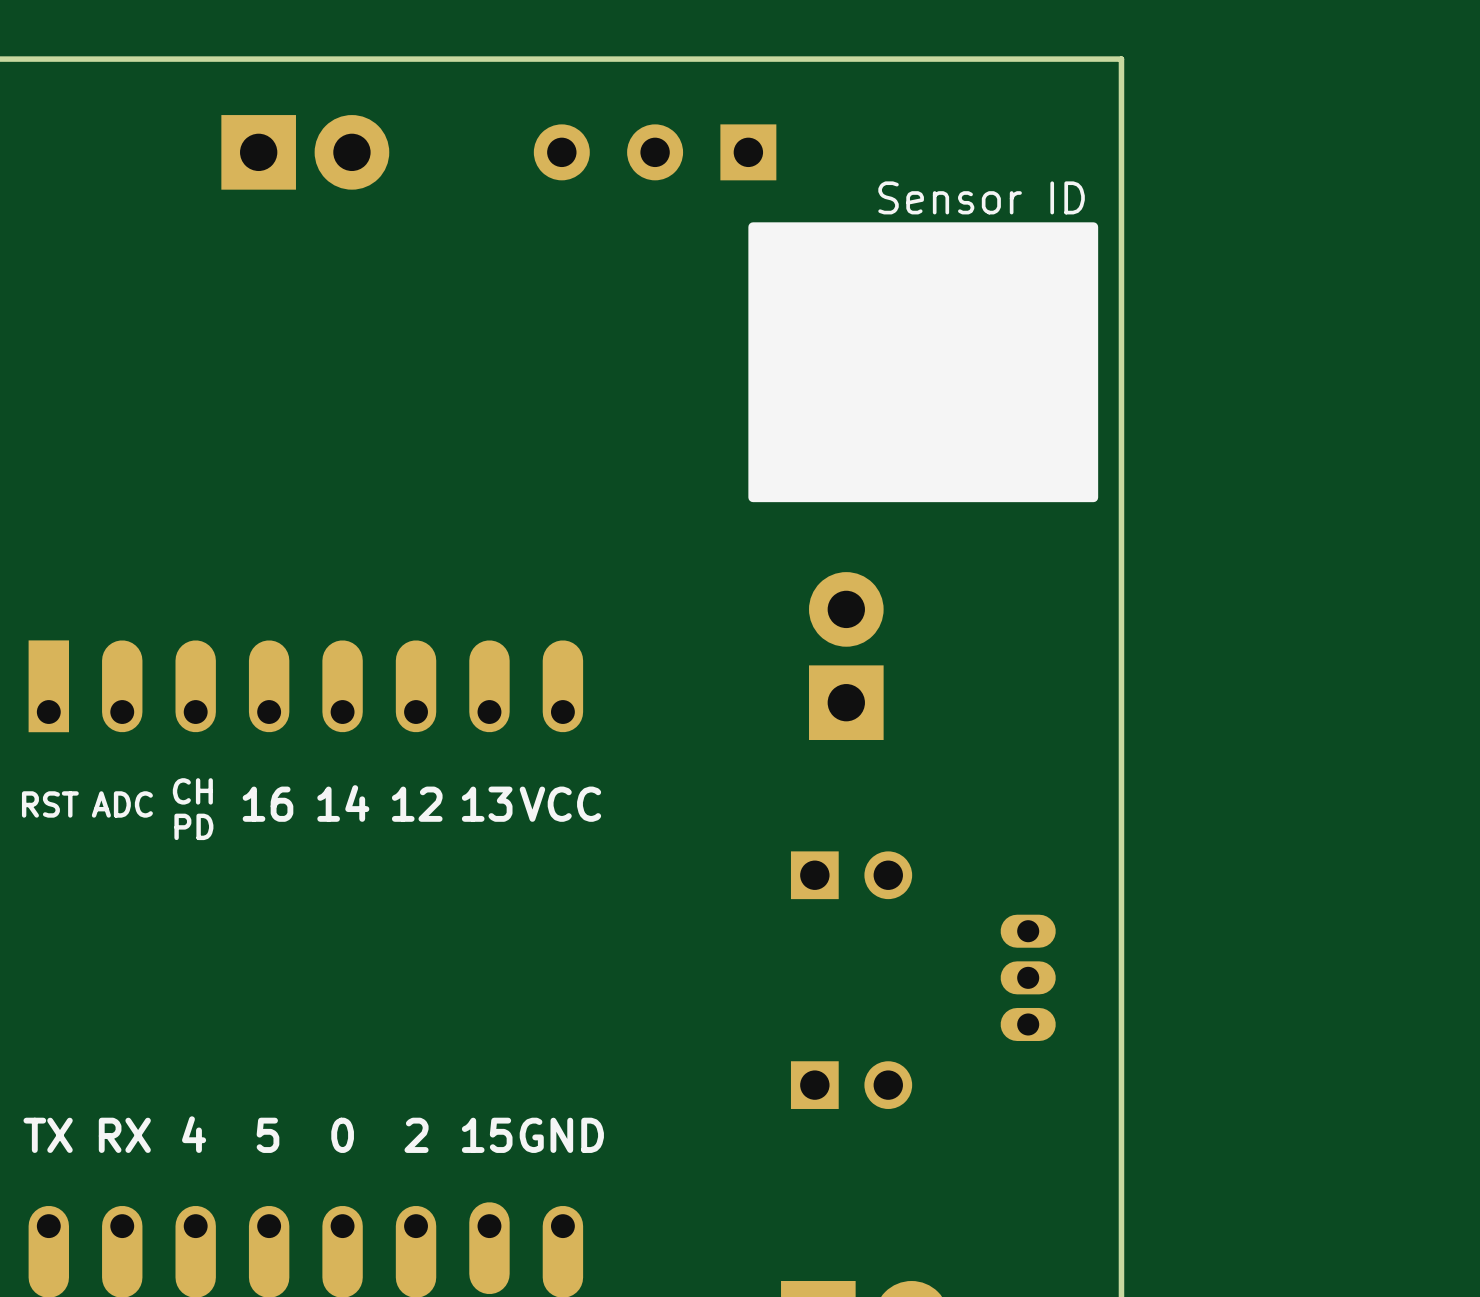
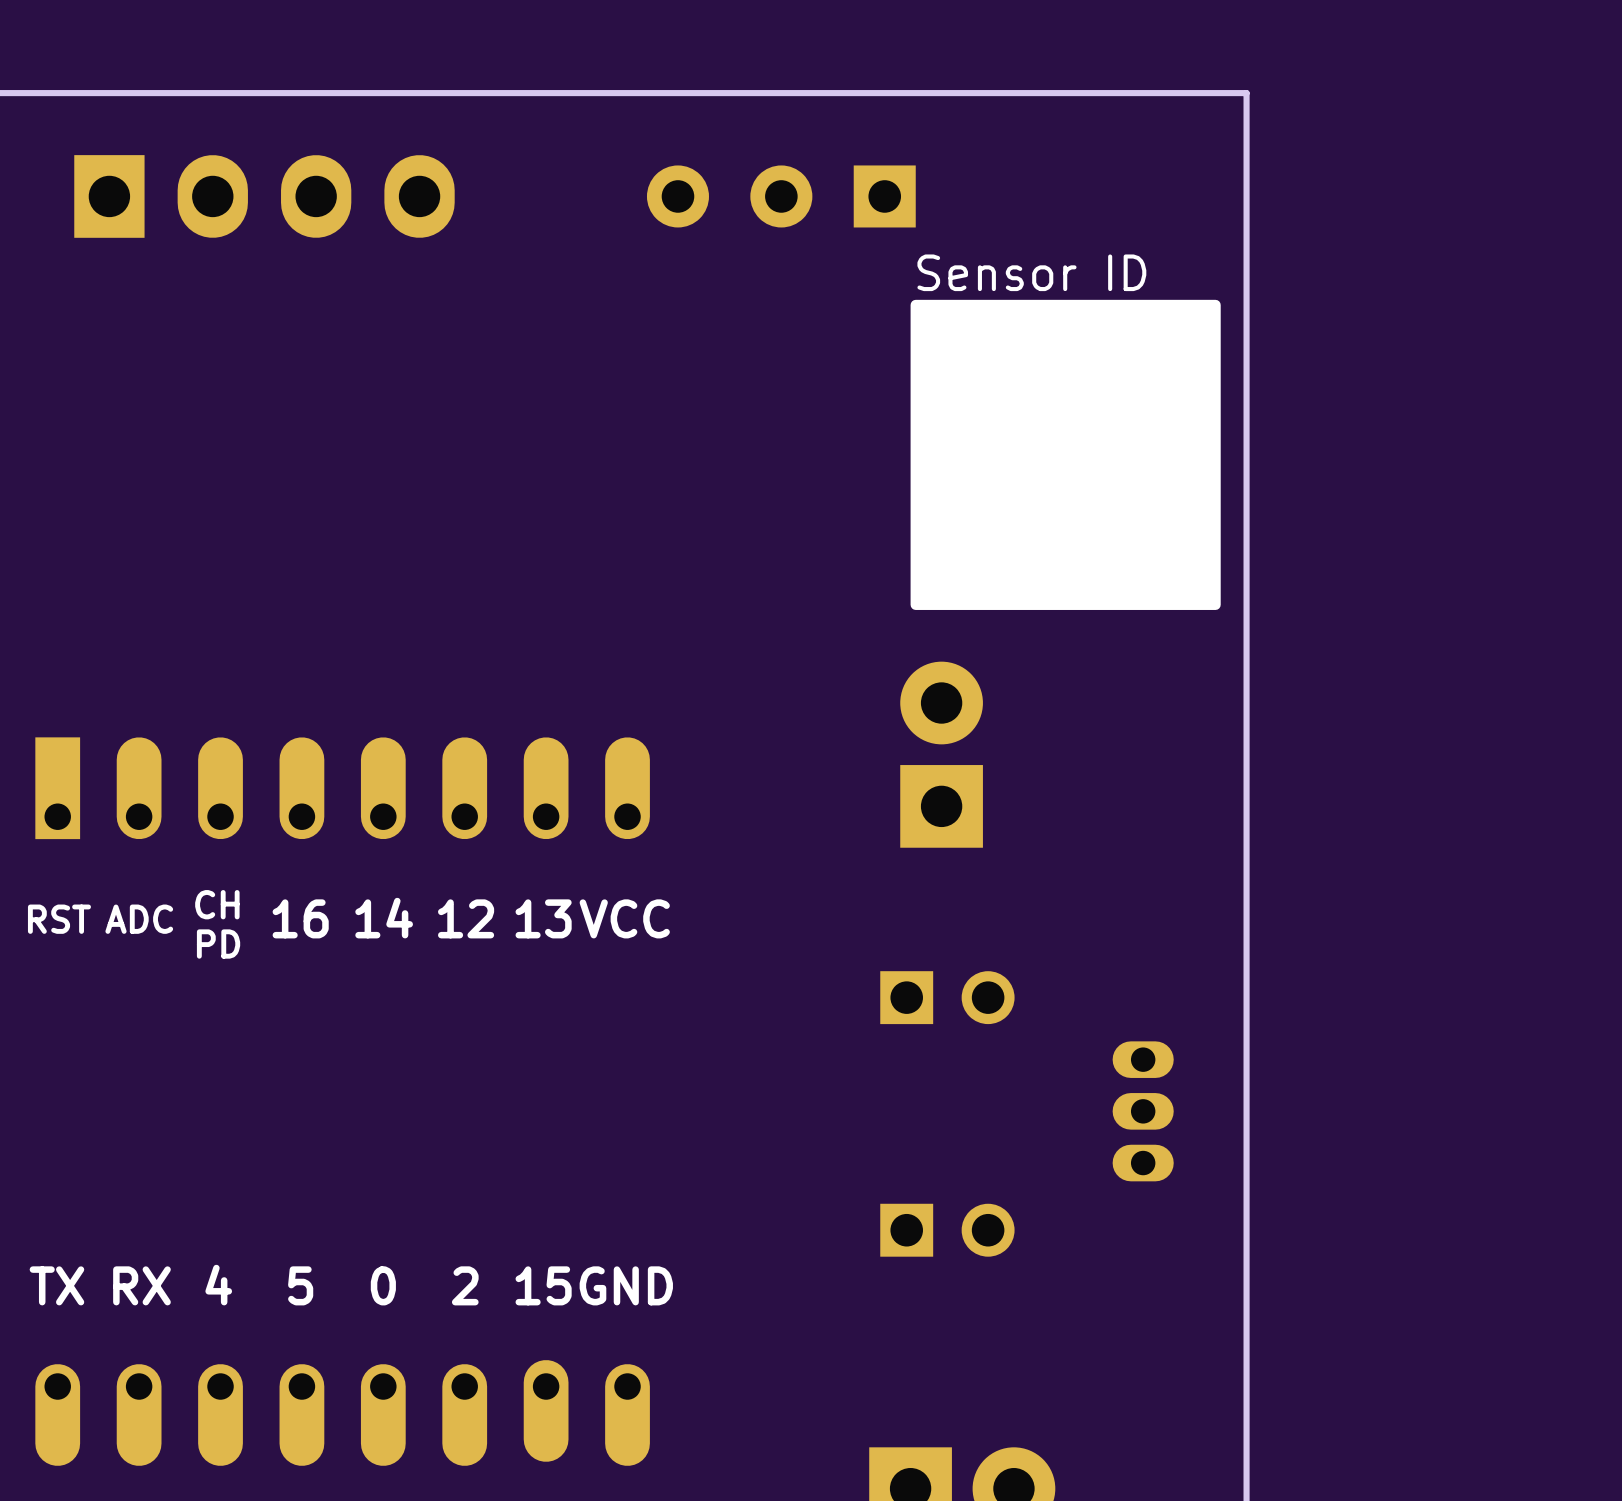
part: none -> (264, 196)
part: (305, 152) -> none
part position: (655, 152) -> (781, 196)
text position: Sensor ID (981, 197) -> Sensor ID (1031, 272)
drawing: [748, 222, 1099, 503] -> none
drawing: none -> [910, 299, 1221, 610]

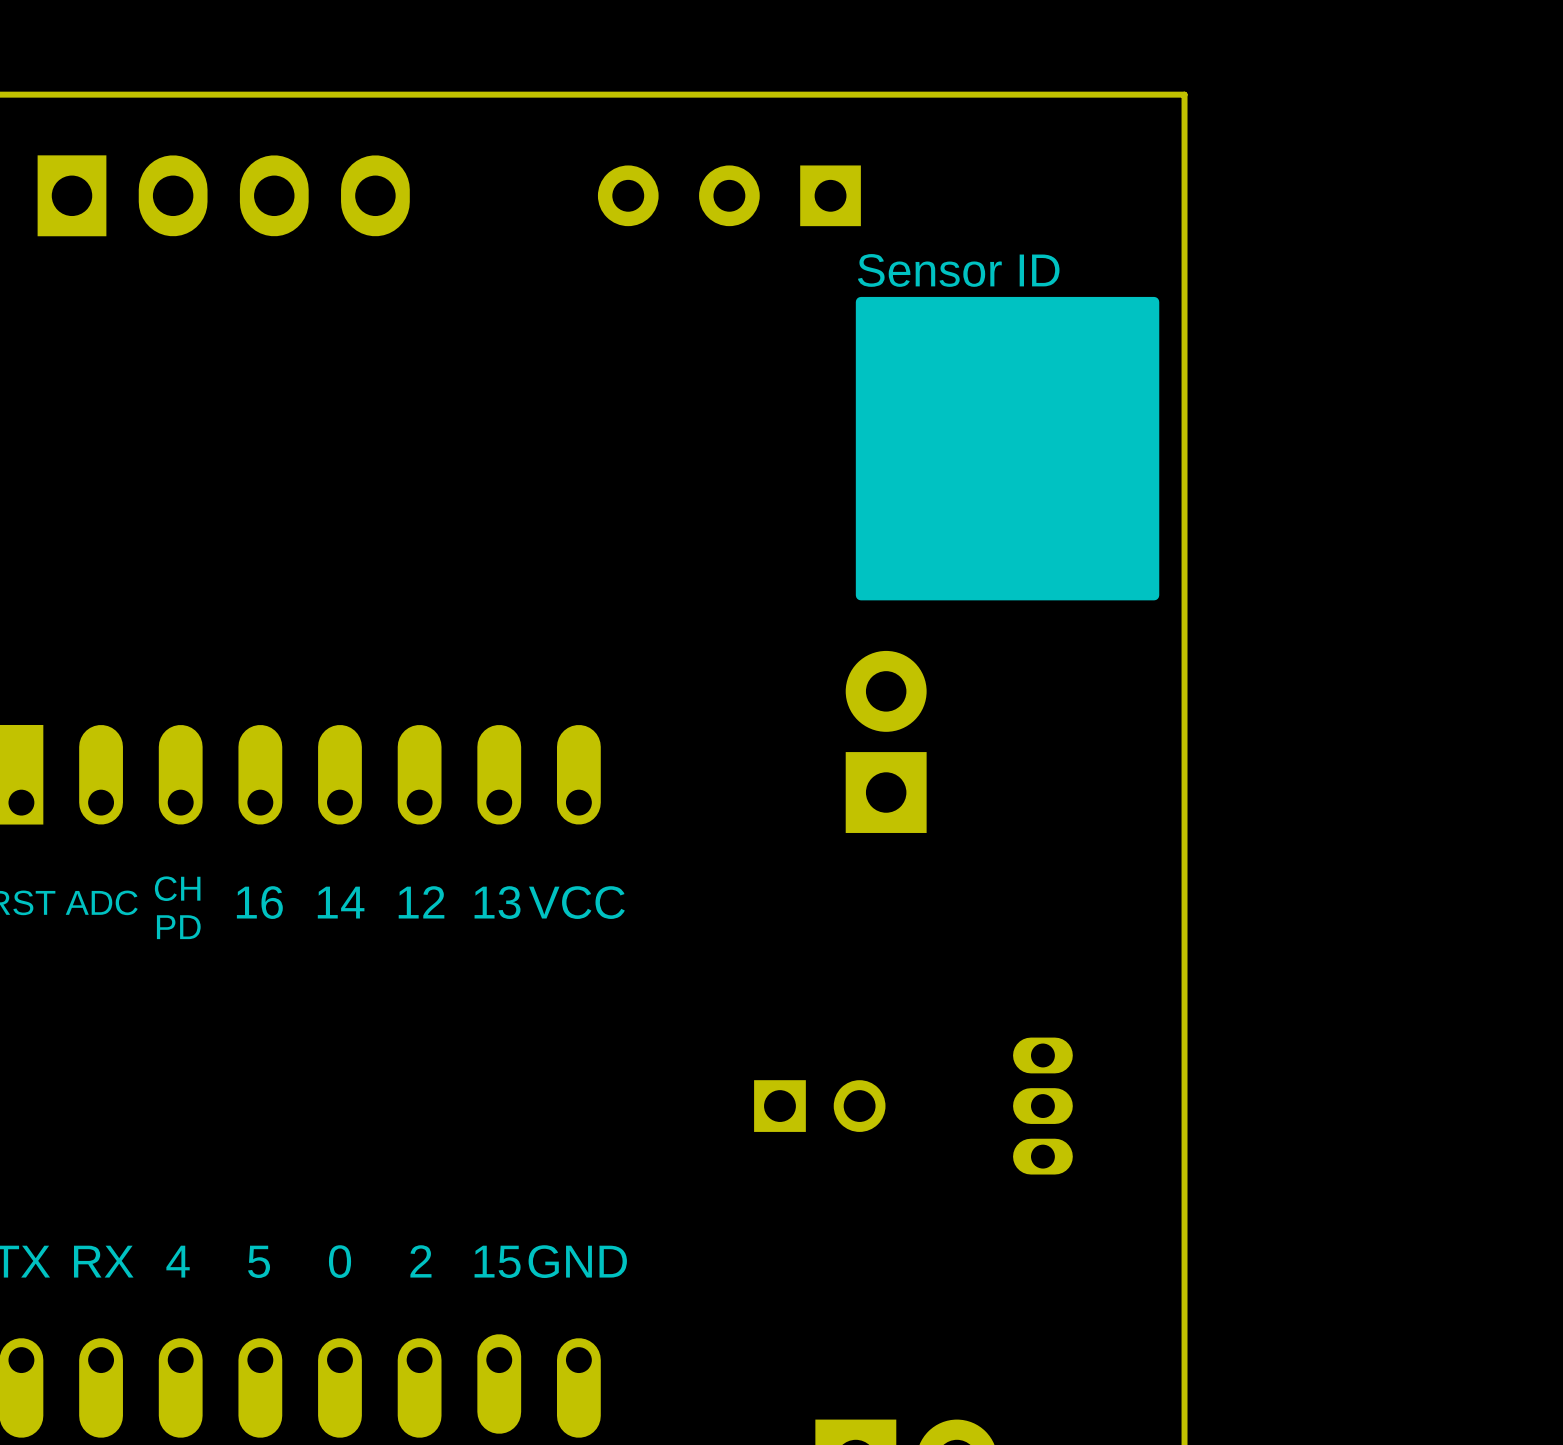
part: (947, 997) -> none
part position: (1143, 1111) -> (1042, 1106)
part: none -> (819, 1106)
part: (947, 1230) -> none

